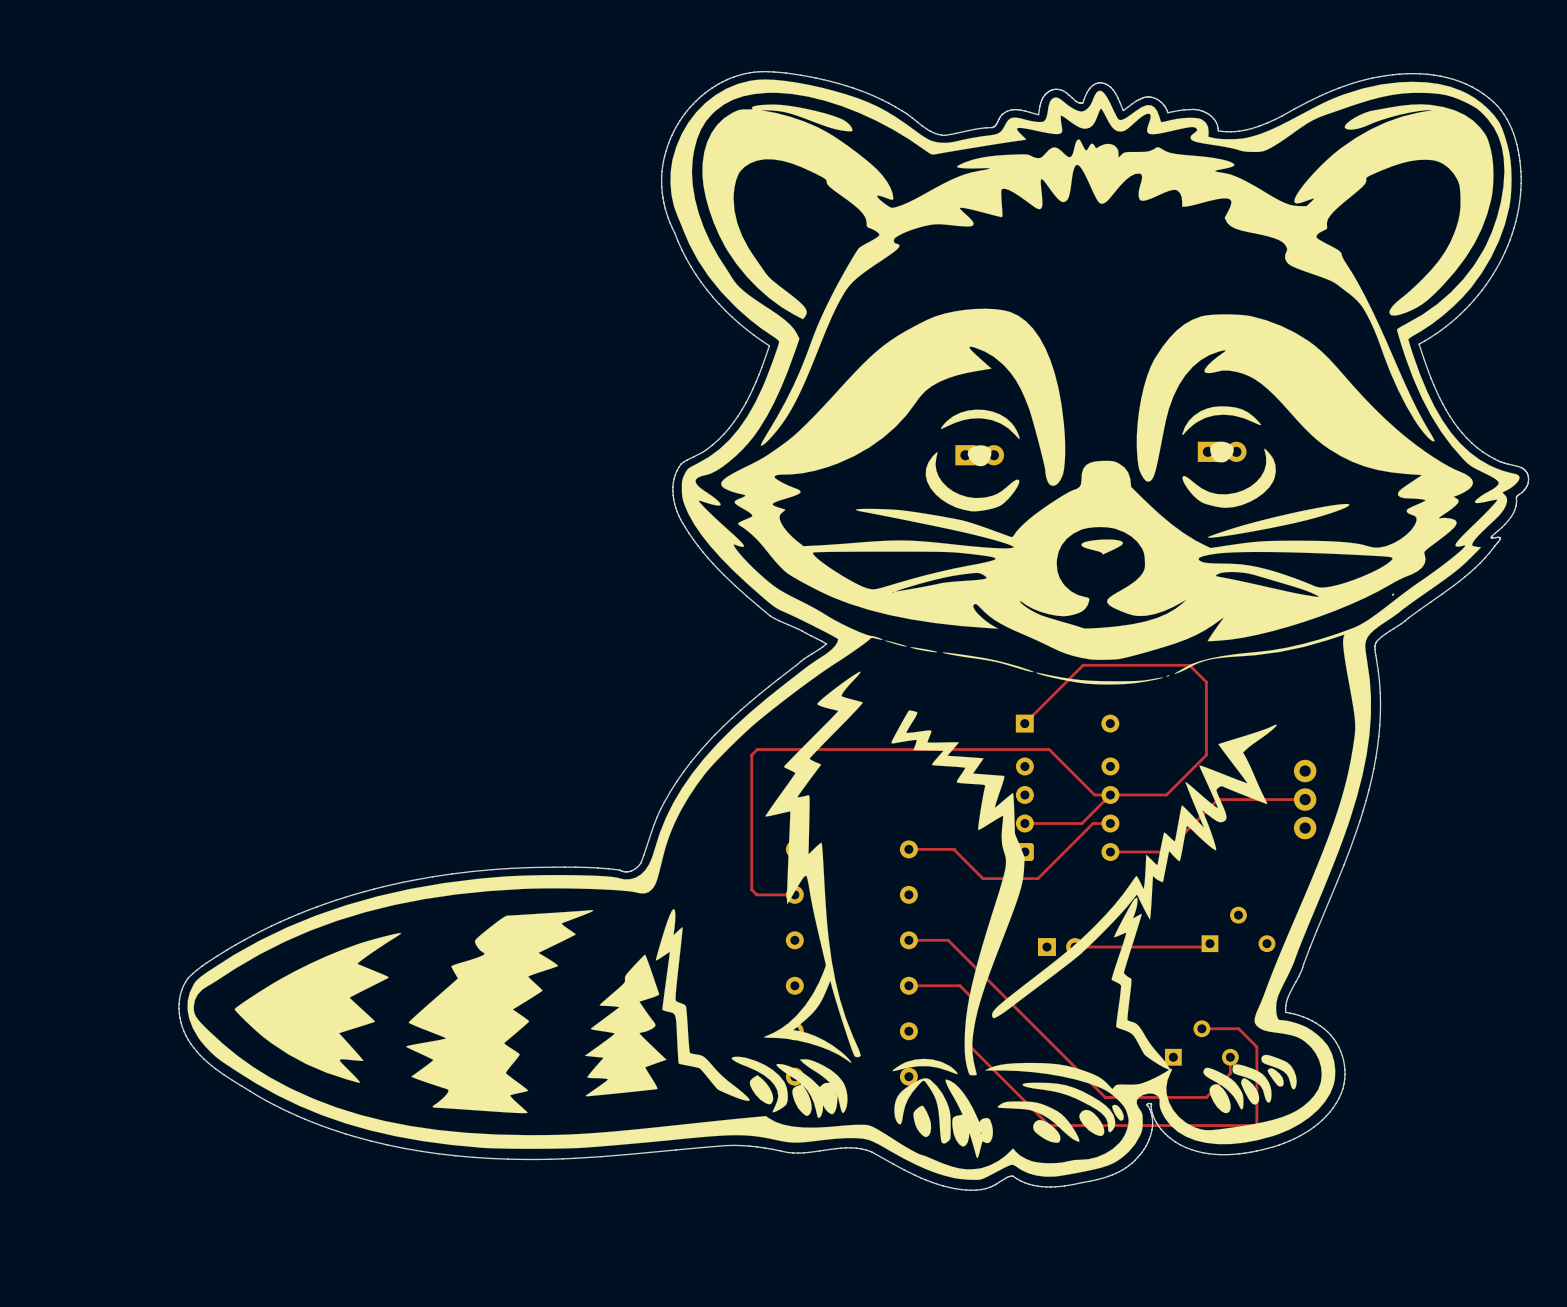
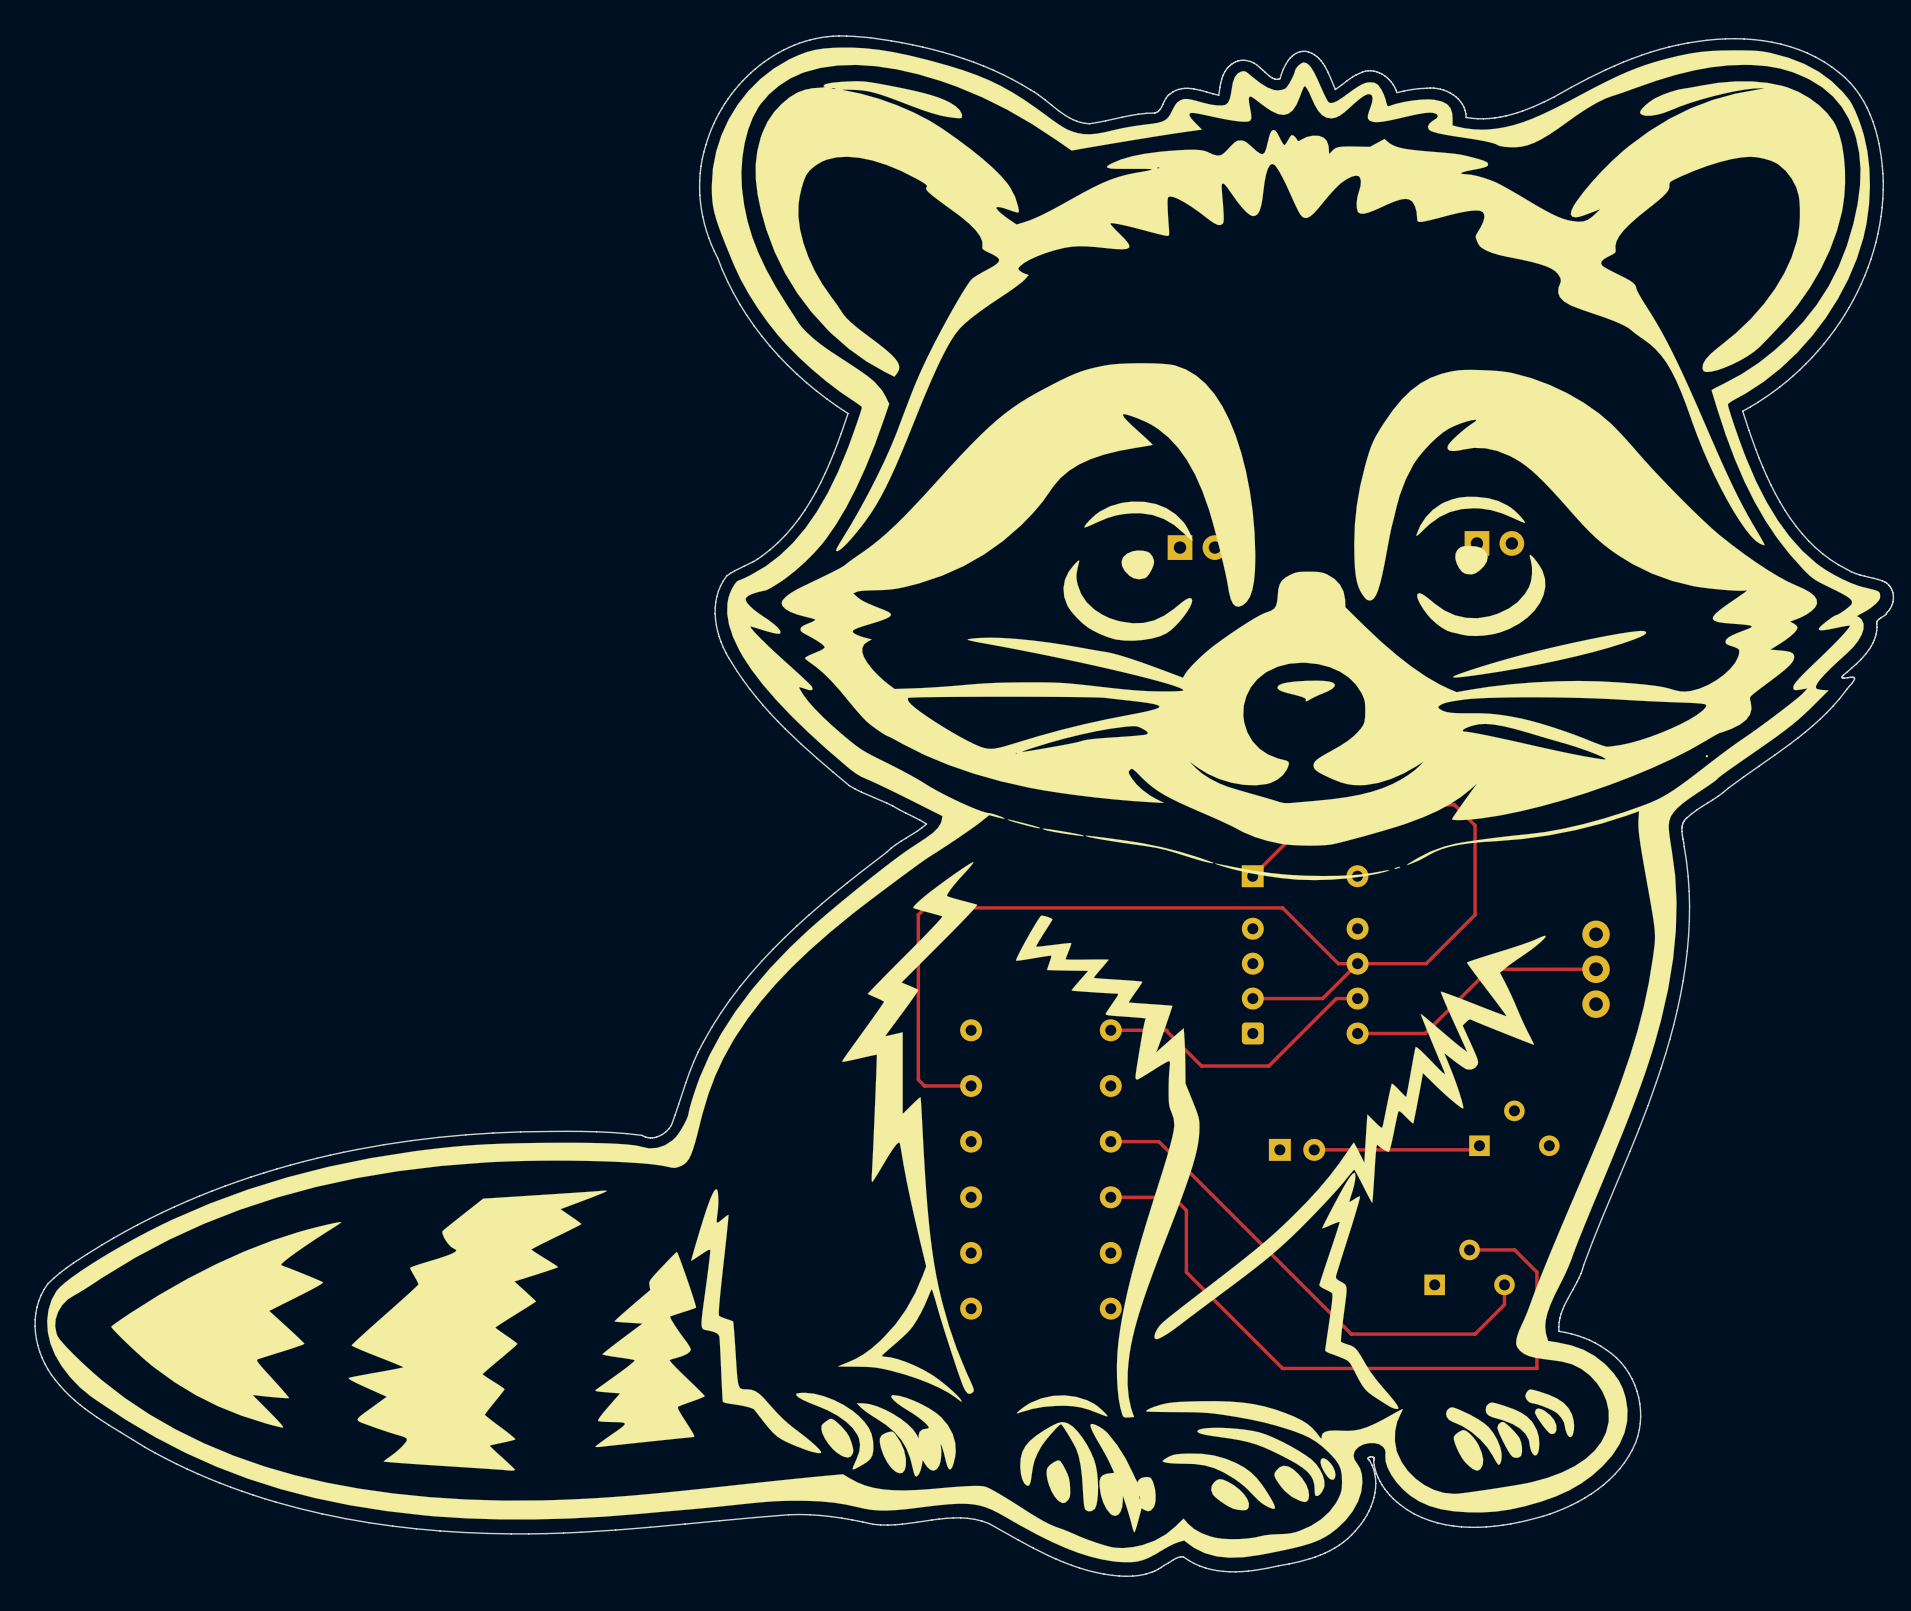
drawing: none -> [47, 47, 1881, 1563]
board edge: (762, 71) (808, 76) (853, 88) (895, 106) (929, 130) (944, 135) (992, 127) (1002, 114) (1011, 109) (1038, 114) (1043, 97) (1052, 89) (1061, 90) (1077, 102) (1083, 102) (1090, 87) (1099, 82) (1106, 84) (1113, 89) (1123, 110) (1138, 99) (1151, 97) (1160, 101) (1167, 112) (1184, 109) (1199, 110) (1212, 117) (1218, 130) (1239, 131) (1267, 123) (1319, 96) (1345, 85) (1372, 78) (1406, 73) (1440, 76) (1472, 87) (1493, 101) (1509, 123) (1518, 149) (1521, 183) (1517, 215) (1507, 245) (1489, 279) (1469, 304) (1445, 326) (1419, 344) (1436, 391) (1457, 427) (1471, 443) (1488, 455) (1501, 462) (1523, 469) (1527, 474) (1528, 482) (1523, 491) (1516, 497) (1515, 508) (1511, 516) (1491, 537) (1500, 538) (1484, 558) (1459, 581) (1382, 636) (1375, 644) (1380, 714) (1377, 747) (1369, 789) (1350, 848) (1301, 970) (1288, 996) (1285, 1009) (1285, 1012) (1303, 1016) (1316, 1023) (1333, 1038) (1343, 1060) (1344, 1084) (1338, 1098) (1326, 1116) (1313, 1127) (1294, 1138) (1274, 1146) (1244, 1153) (1220, 1154) (1197, 1151) (1180, 1145) (1165, 1133) (1155, 1121) (1151, 1104) (1149, 1103) (1147, 1104) (1151, 1112) (1152, 1122) (1147, 1142) (1135, 1160) (1115, 1173) (1089, 1181) (1050, 1187) (1028, 1184) (1011, 1176) (990, 1187) (971, 1190) (949, 1187) (931, 1182) (871, 1151) (856, 1148) (792, 1152) (757, 1146) (726, 1145) (550, 1159) (455, 1155) (404, 1148) (370, 1140) (329, 1128) (297, 1115) (258, 1096) (215, 1068) (196, 1051) (186, 1035) (179, 1017) (179, 1003) (181, 990) (188, 977) (206, 962) (244, 939) (316, 906) (393, 884) (471, 871) (553, 867) (597, 867) (625, 871) (634, 869) (641, 862) (664, 802) (676, 781) (698, 752) (750, 702) (800, 661) (826, 643) (770, 616) (723, 574) (688, 533) (678, 515) (673, 495) (674, 478) (681, 463) (712, 444) (738, 416) (752, 389) (769, 345) (746, 329) (725, 310) (706, 289) (690, 266) (678, 241) (665, 208) (661, 182) (663, 161) (675, 127) (687, 110) (698, 98) (715, 85) (730, 78) (746, 73) (762, 71) -> (838, 35) (870, 37) (901, 42) (963, 58) (993, 70) (1021, 84) (1069, 117) (1089, 123) (1138, 114) (1155, 113) (1159, 109) (1168, 94) (1181, 88) (1194, 88) (1218, 95) (1224, 71) (1237, 61) (1249, 61) (1271, 77) (1279, 78) (1290, 58) (1302, 51) (1311, 53) (1321, 61) (1335, 89) (1356, 74) (1365, 71) (1373, 71) (1387, 77) (1396, 92) (1419, 88) (1440, 89) (1458, 99) (1463, 107) (1466, 117) (1494, 117) (1533, 106) (1605, 69) (1641, 55) (1678, 44) (1725, 38) (1771, 42) (1798, 49) (1815, 57) (1845, 77) (1855, 88) (1867, 107) (1878, 143) (1883, 189) (1877, 233) (1864, 275) (1844, 315) (1818, 350) (1779, 387) (1742, 411) (1766, 476) (1780, 502) (1796, 526) (1815, 547) (1838, 564) (1855, 573) (1886, 583) (1892, 590) (1892, 601) (1886, 614) (1876, 622) (1875, 636) (1869, 648) (1842, 676) (1853, 677) (1854, 679) (1833, 705) (1797, 737) (1691, 813) (1682, 824) (1688, 876) (1689, 921) (1685, 966) (1673, 1024) (1648, 1105) (1580, 1273) (1562, 1309) (1558, 1326) (1558, 1331) (1583, 1337) (1600, 1346) (1616, 1357) (1625, 1367) (1632, 1378) (1638, 1397) (1640, 1416) (1639, 1430) (1632, 1449) (1614, 1474) (1597, 1489) (1571, 1505) (1542, 1516) (1502, 1525) (1469, 1527) (1437, 1522) (1414, 1514) (1393, 1498) (1379, 1481) (1375, 1469) (1374, 1458) (1370, 1456) (1368, 1458) (1373, 1469) (1375, 1483) (1370, 1506) (1364, 1519) (1351, 1534) (1330, 1550) (1299, 1561) (1241, 1571) (1211, 1569) (1180, 1556) (1152, 1572) (1125, 1576) (1095, 1572) (1071, 1565) (1033, 1548) (988, 1523) (967, 1518) (946, 1518) (880, 1524) (831, 1516) (788, 1514) (615, 1530) (546, 1533) (487, 1533) (416, 1528) (345, 1518) (298, 1508) (241, 1491) (197, 1473) (144, 1446) (85, 1409) (59, 1385) (44, 1363) (36, 1339) (35, 1319) (38, 1300) (47, 1283) (73, 1262) (125, 1231) (174, 1206) (225, 1186) (277, 1168) (330, 1155) (384, 1144) (438, 1137) (550, 1131) (611, 1132) (650, 1137) (662, 1134) (671, 1125) (689, 1072) (703, 1041) (720, 1013) (750, 973) (784, 937) (821, 904) (891, 848) (926, 824) (849, 785) (785, 728) (756, 697) (737, 671) (723, 647) (715, 619) (716, 596) (726, 576) (757, 559) (770, 549) (785, 535) (804, 510) (825, 473) (848, 413) (816, 390) (787, 365) (761, 336) (739, 304) (722, 269) (704, 223) (699, 187) (702, 159) (709, 134) (719, 113) (735, 89) (750, 72) (773, 55) (794, 45) (815, 38) (838, 35)
drawing: [187, 79, 1520, 1180] -> none

